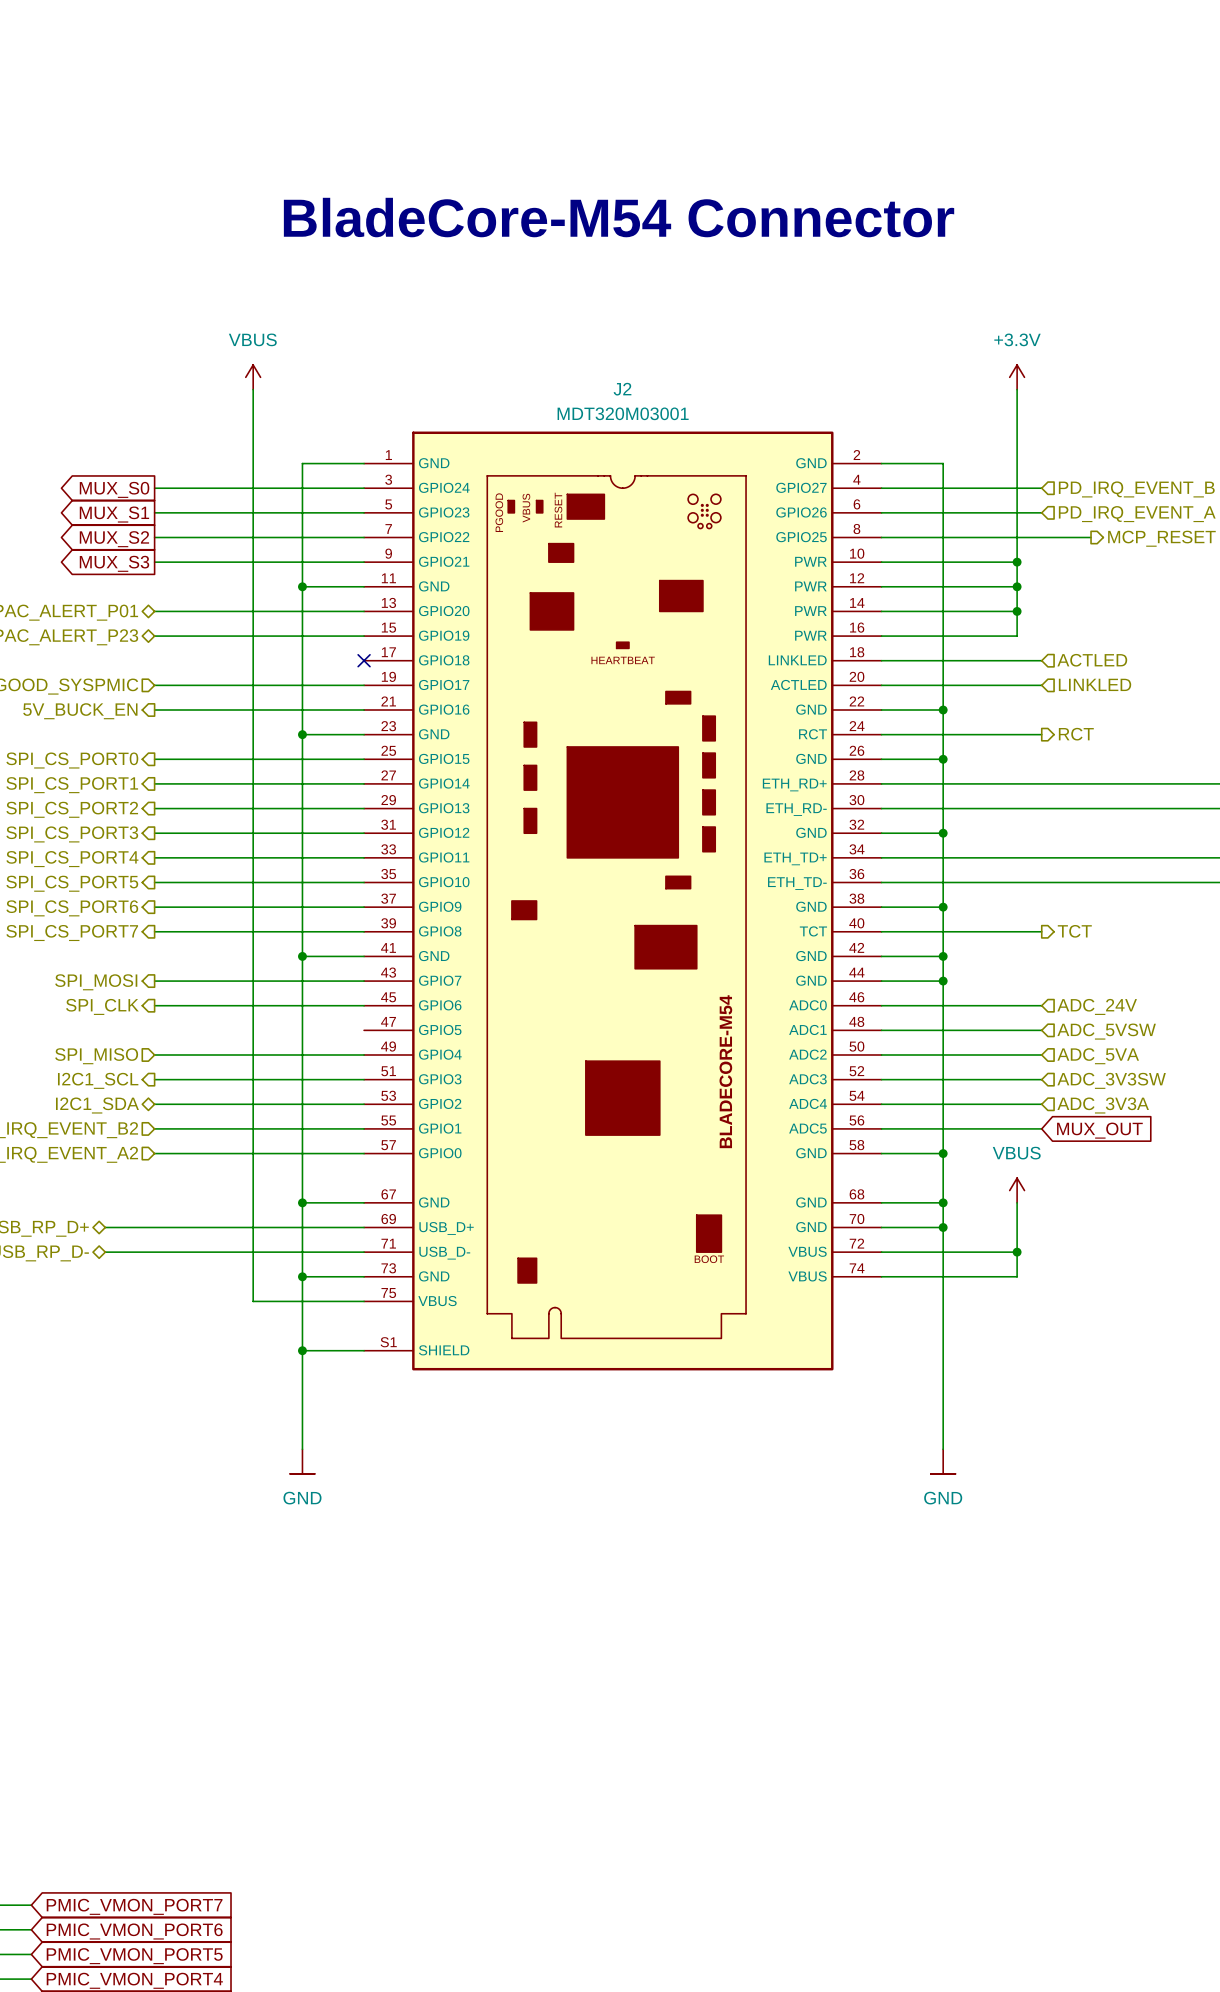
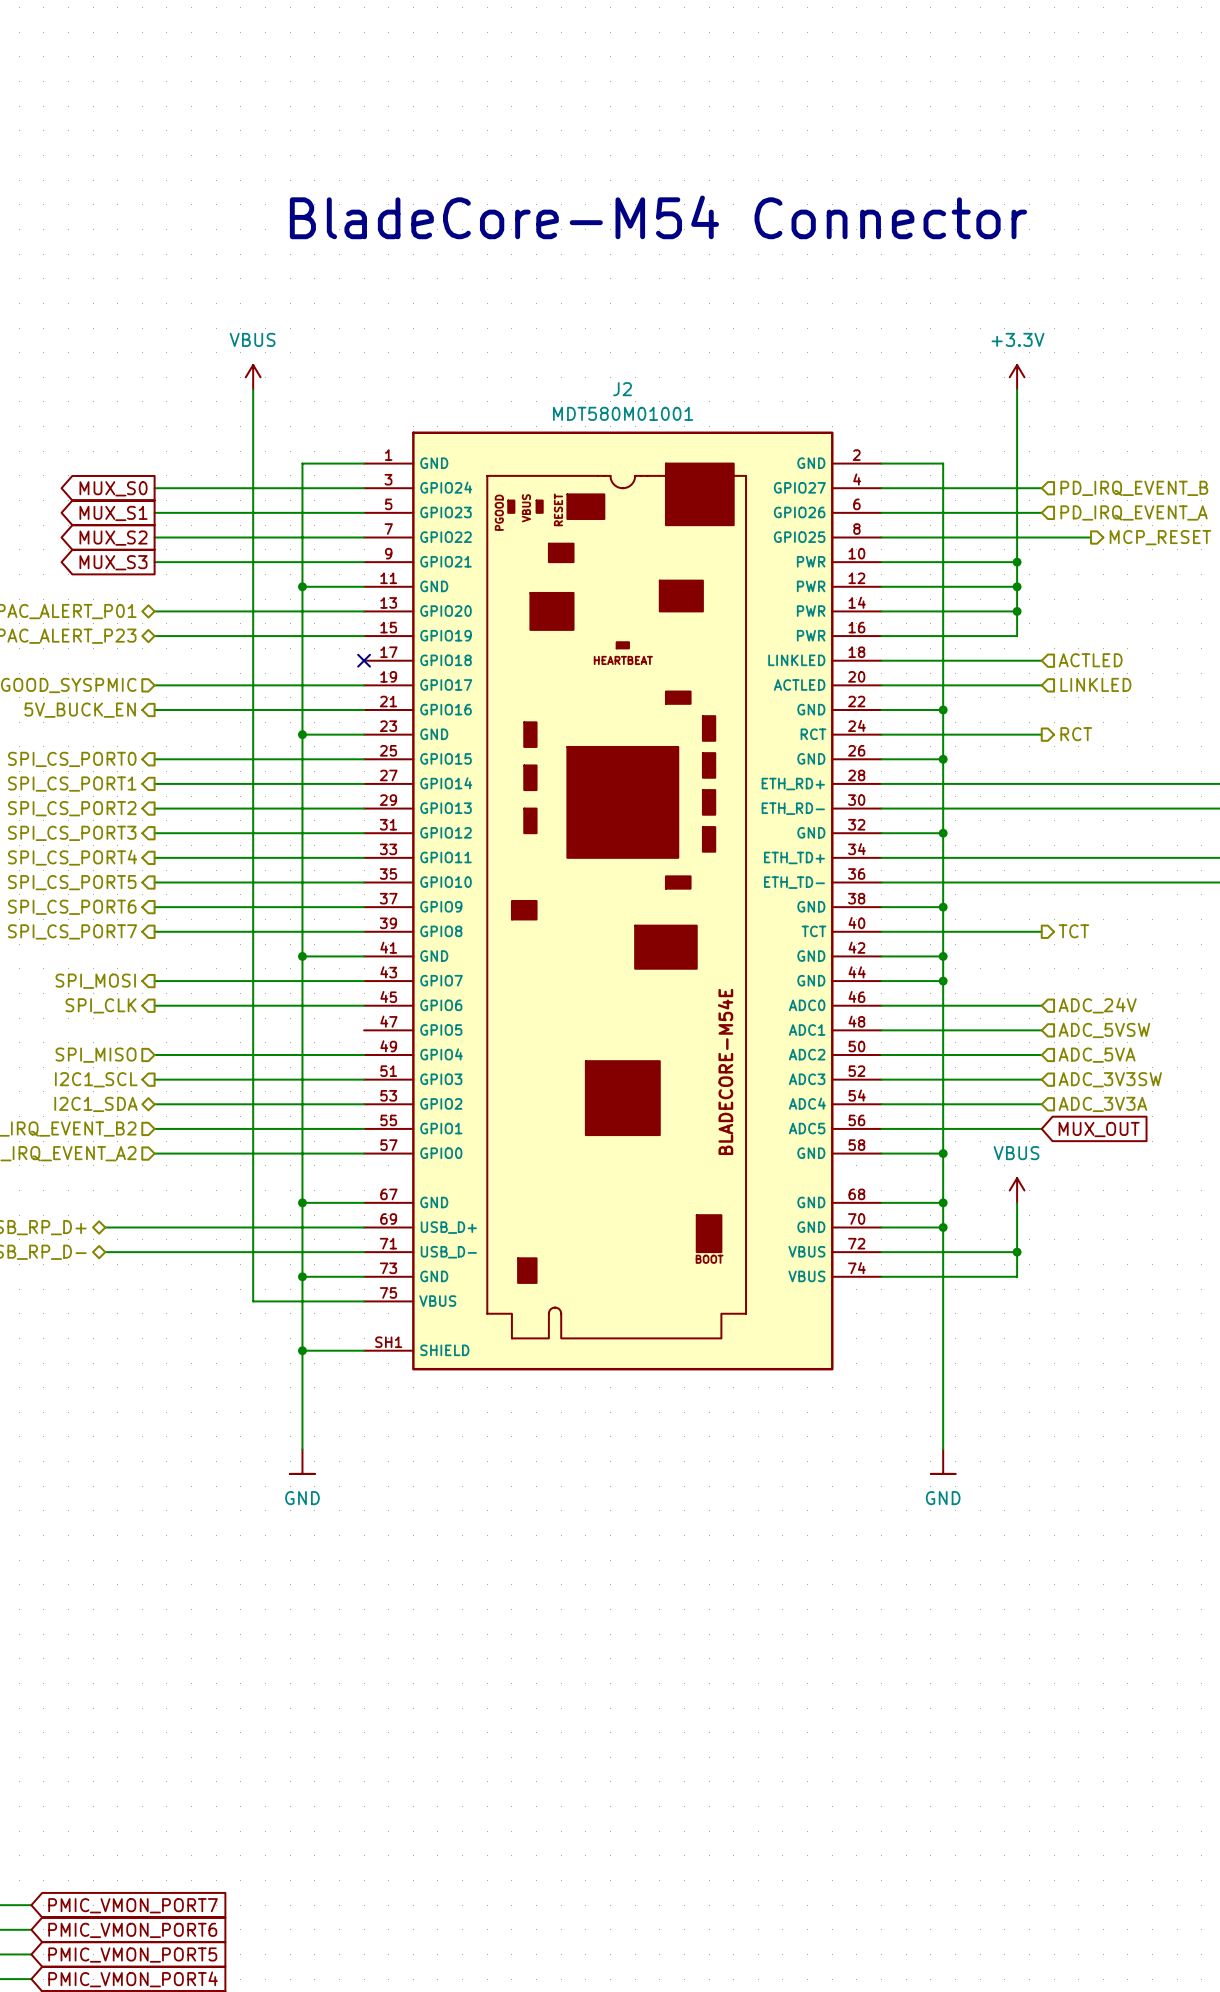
J2 value: MDT320M03001 (623, 413) -> MDT580M01001 (623, 413)
J2 symbol: [364, 431, 882, 1371] -> [364, 431, 882, 1371]

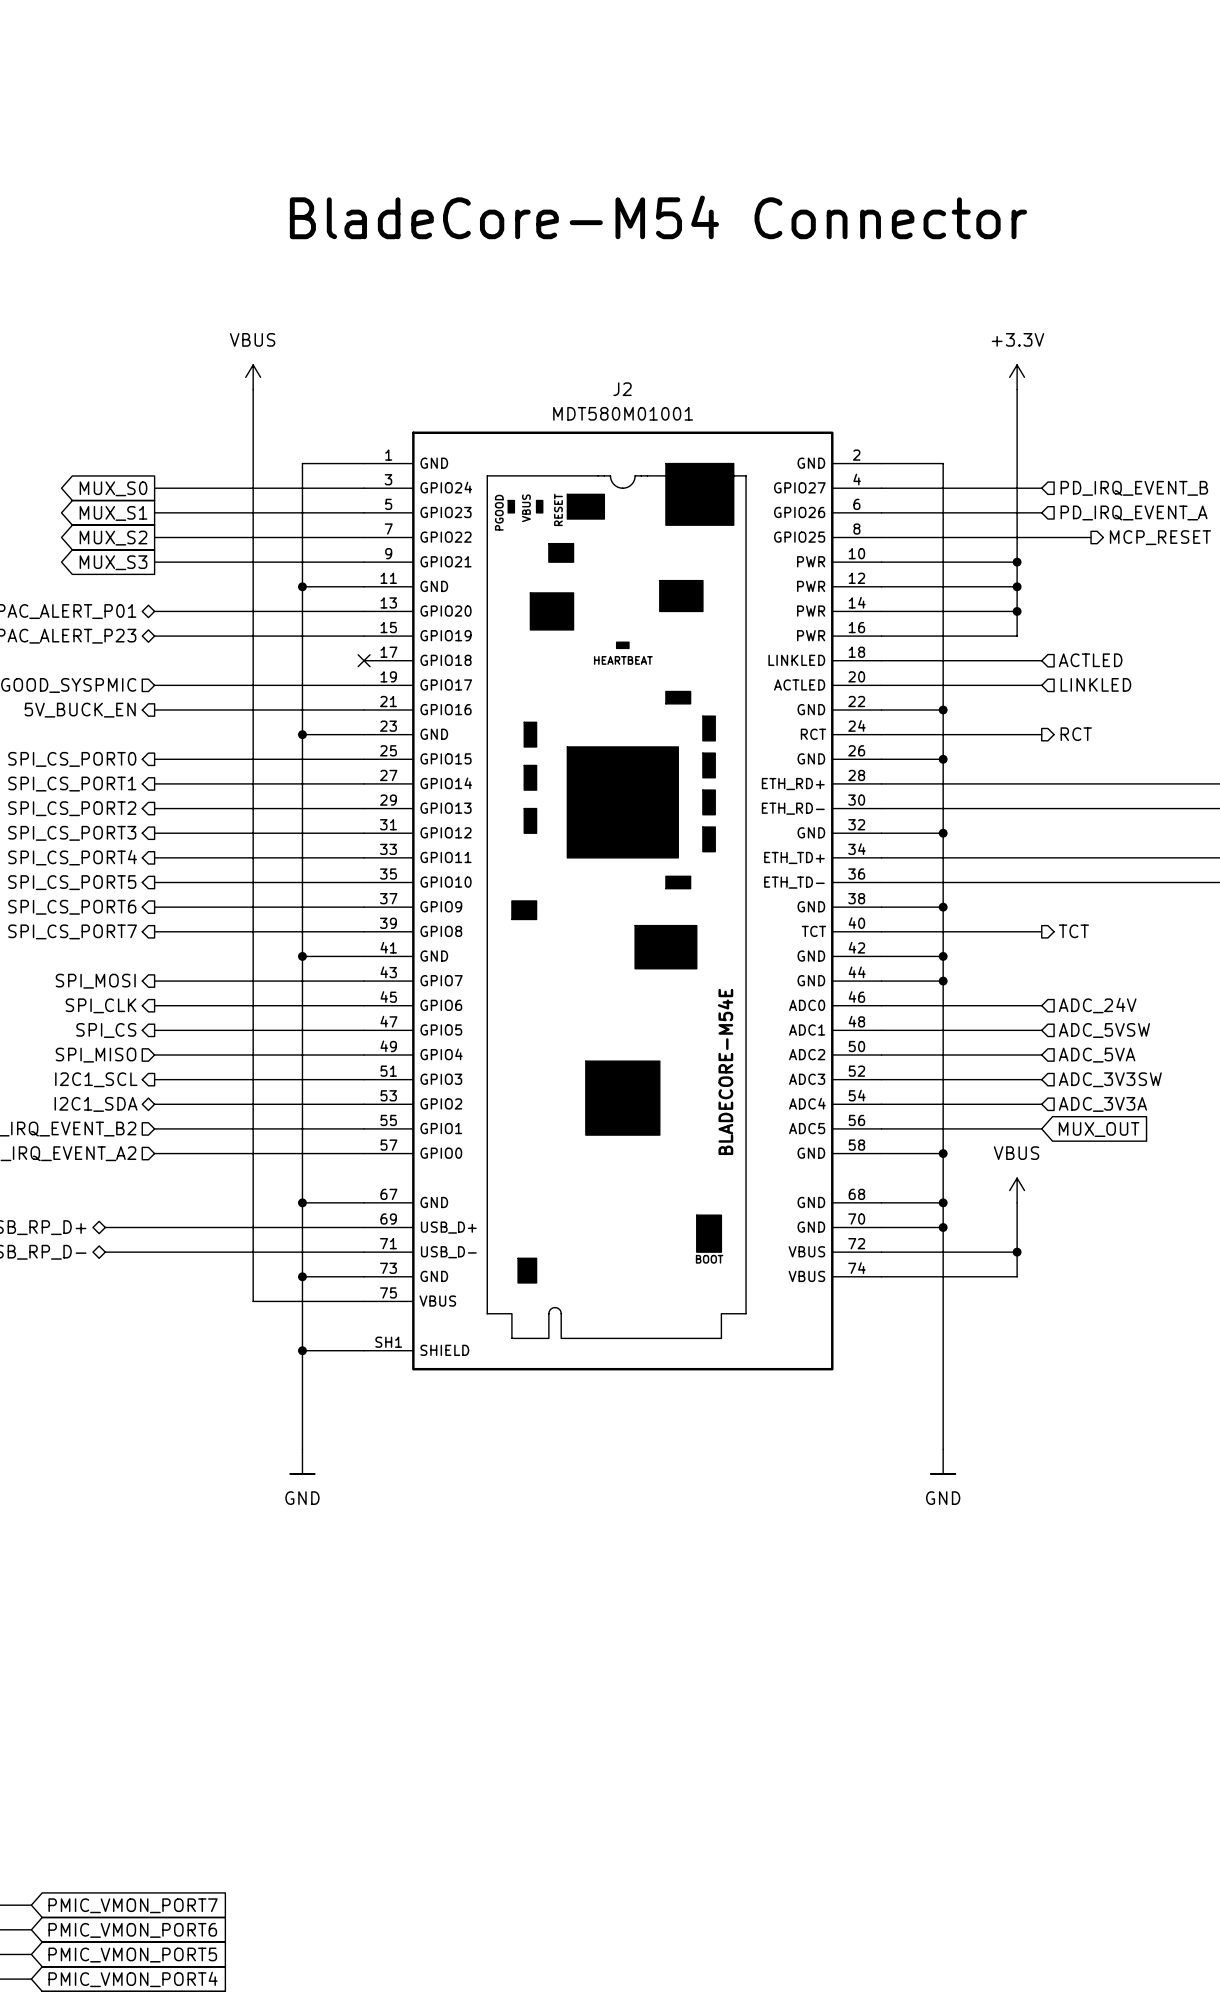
hierarchical label: none -> SPI_CS (106, 1030)
wire: none -> (154, 1030) (364, 1030)

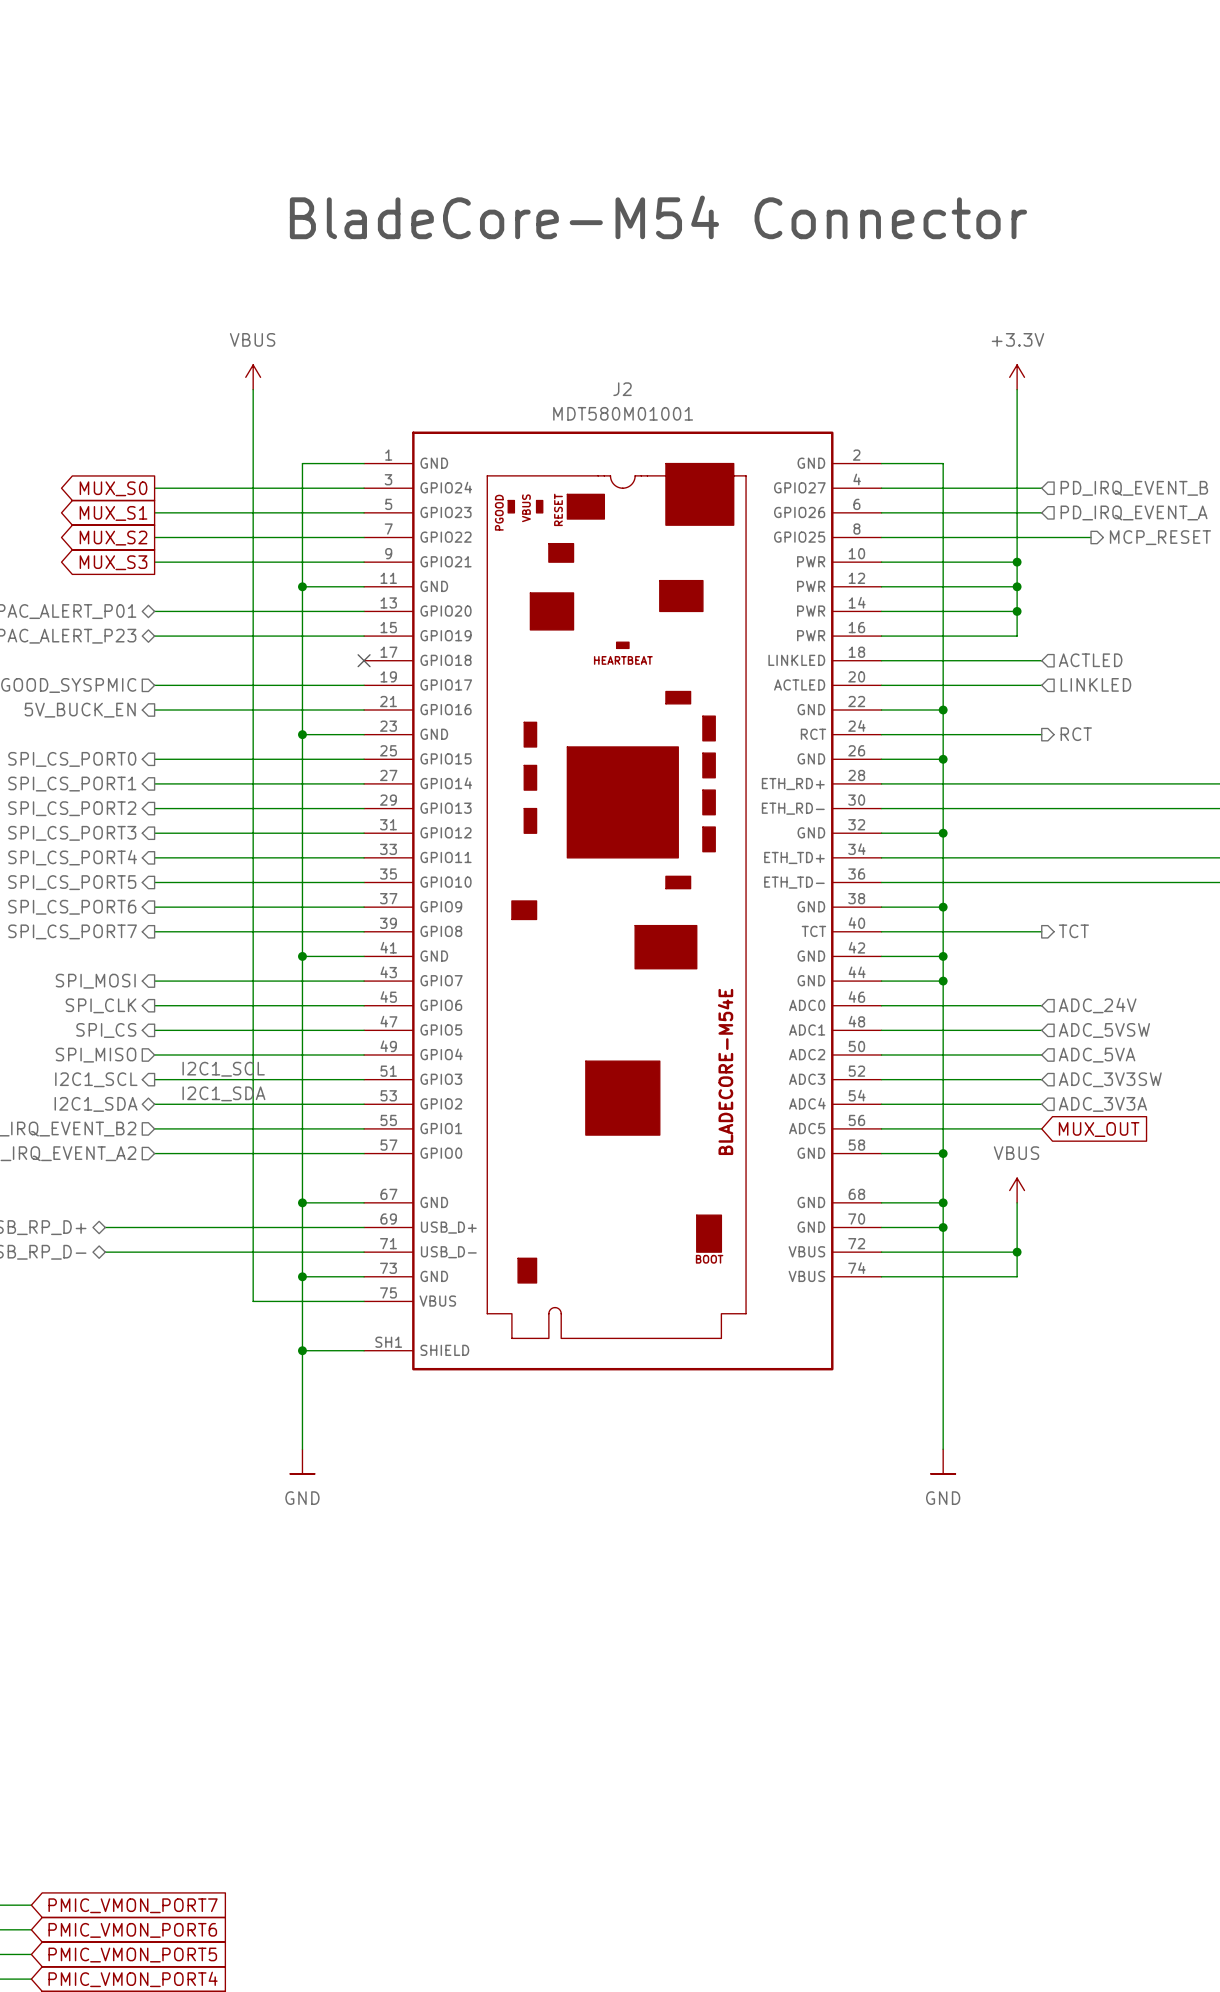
label: none -> I2C1_SCL (223, 1069)
label: none -> I2C1_SDA (223, 1093)

